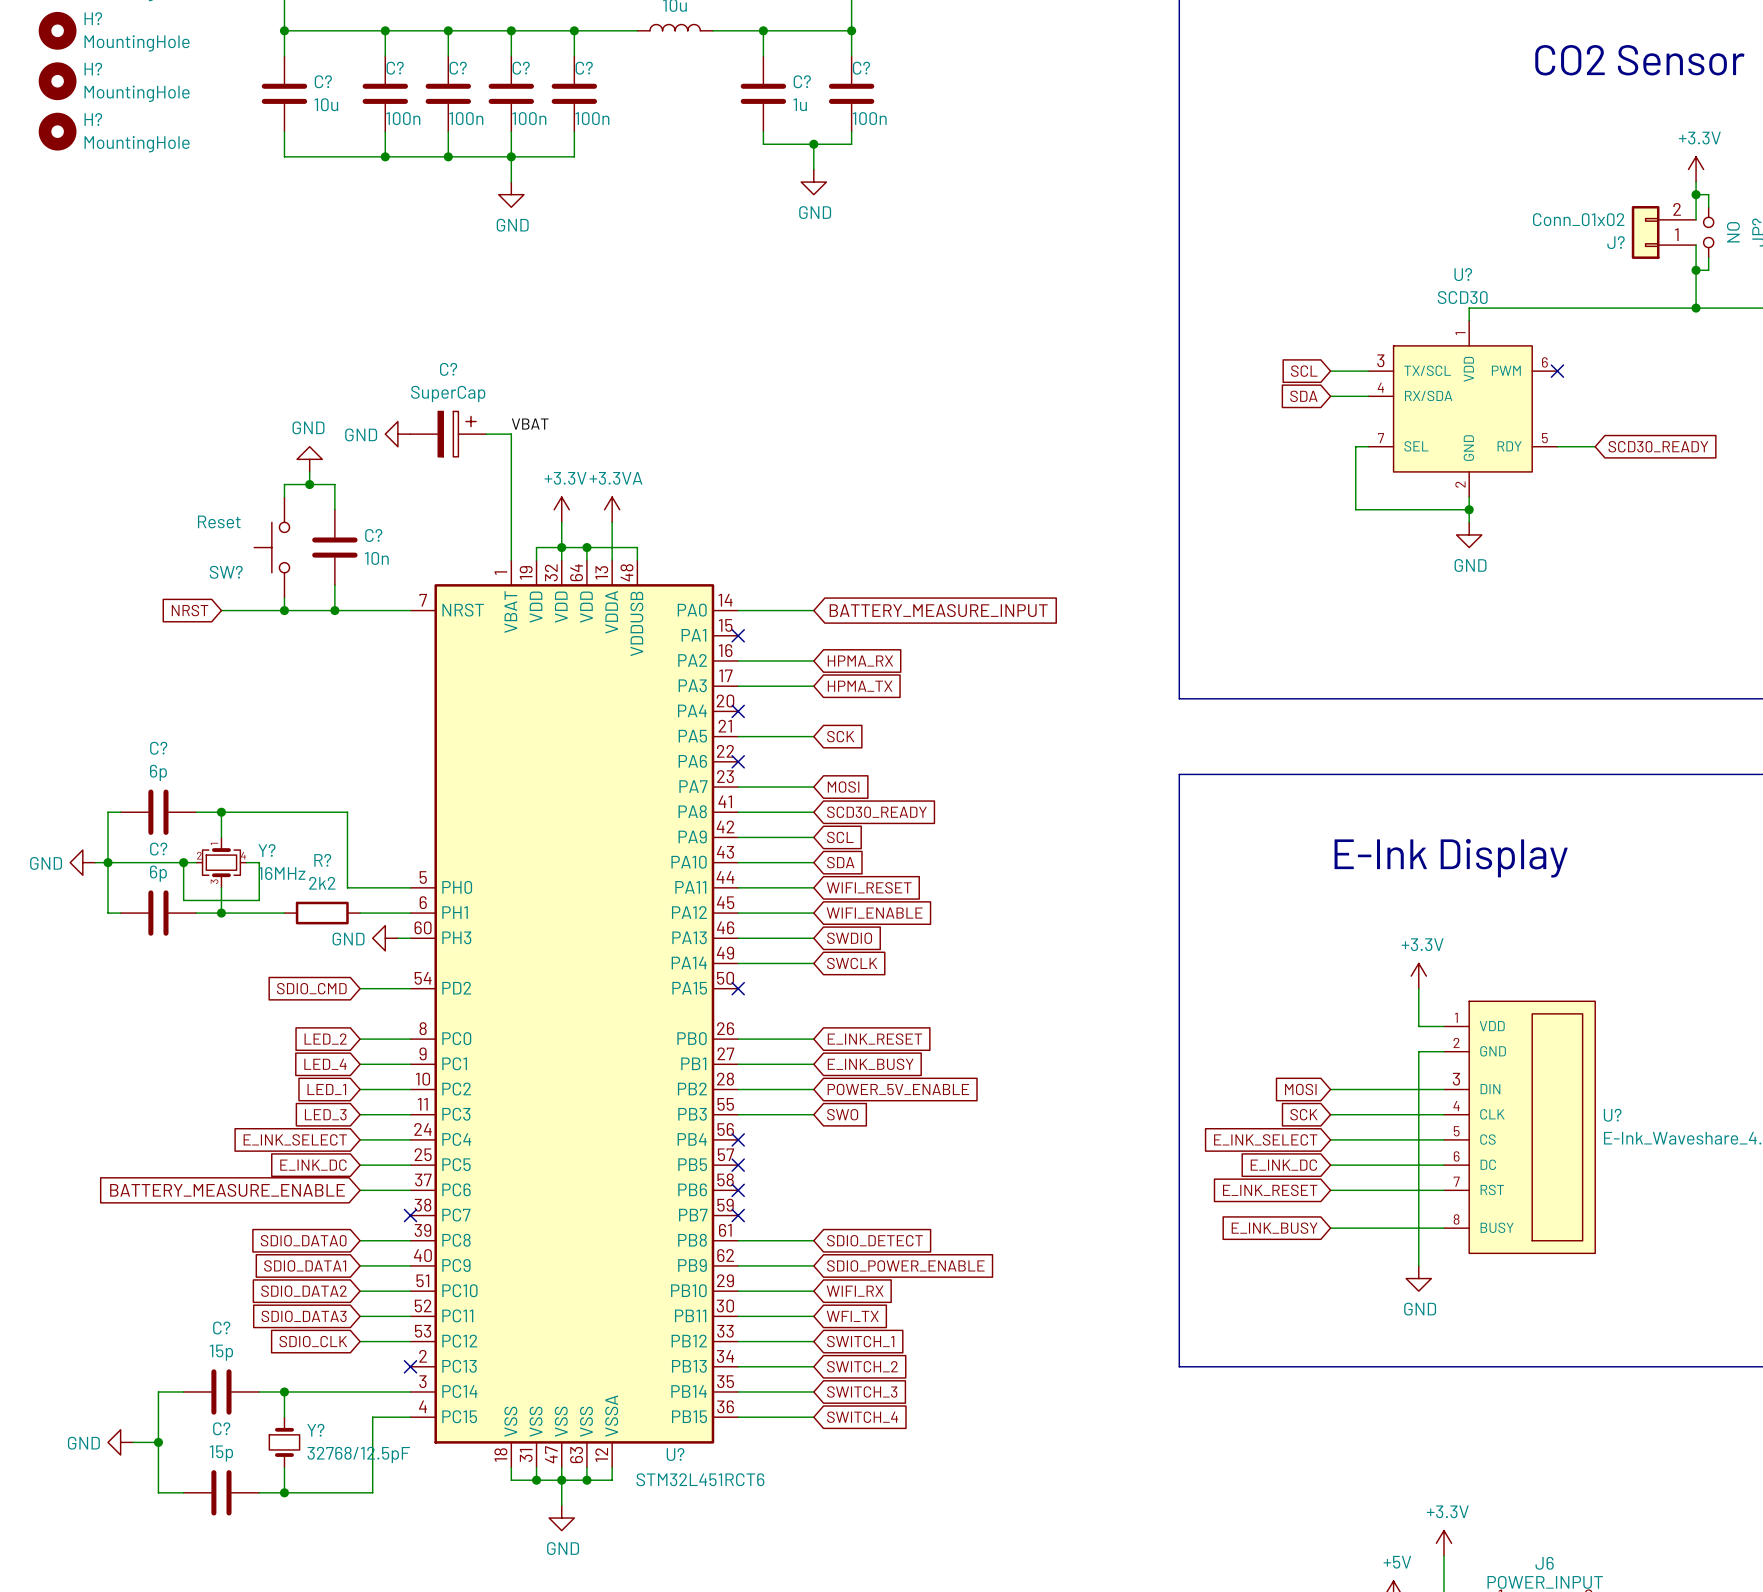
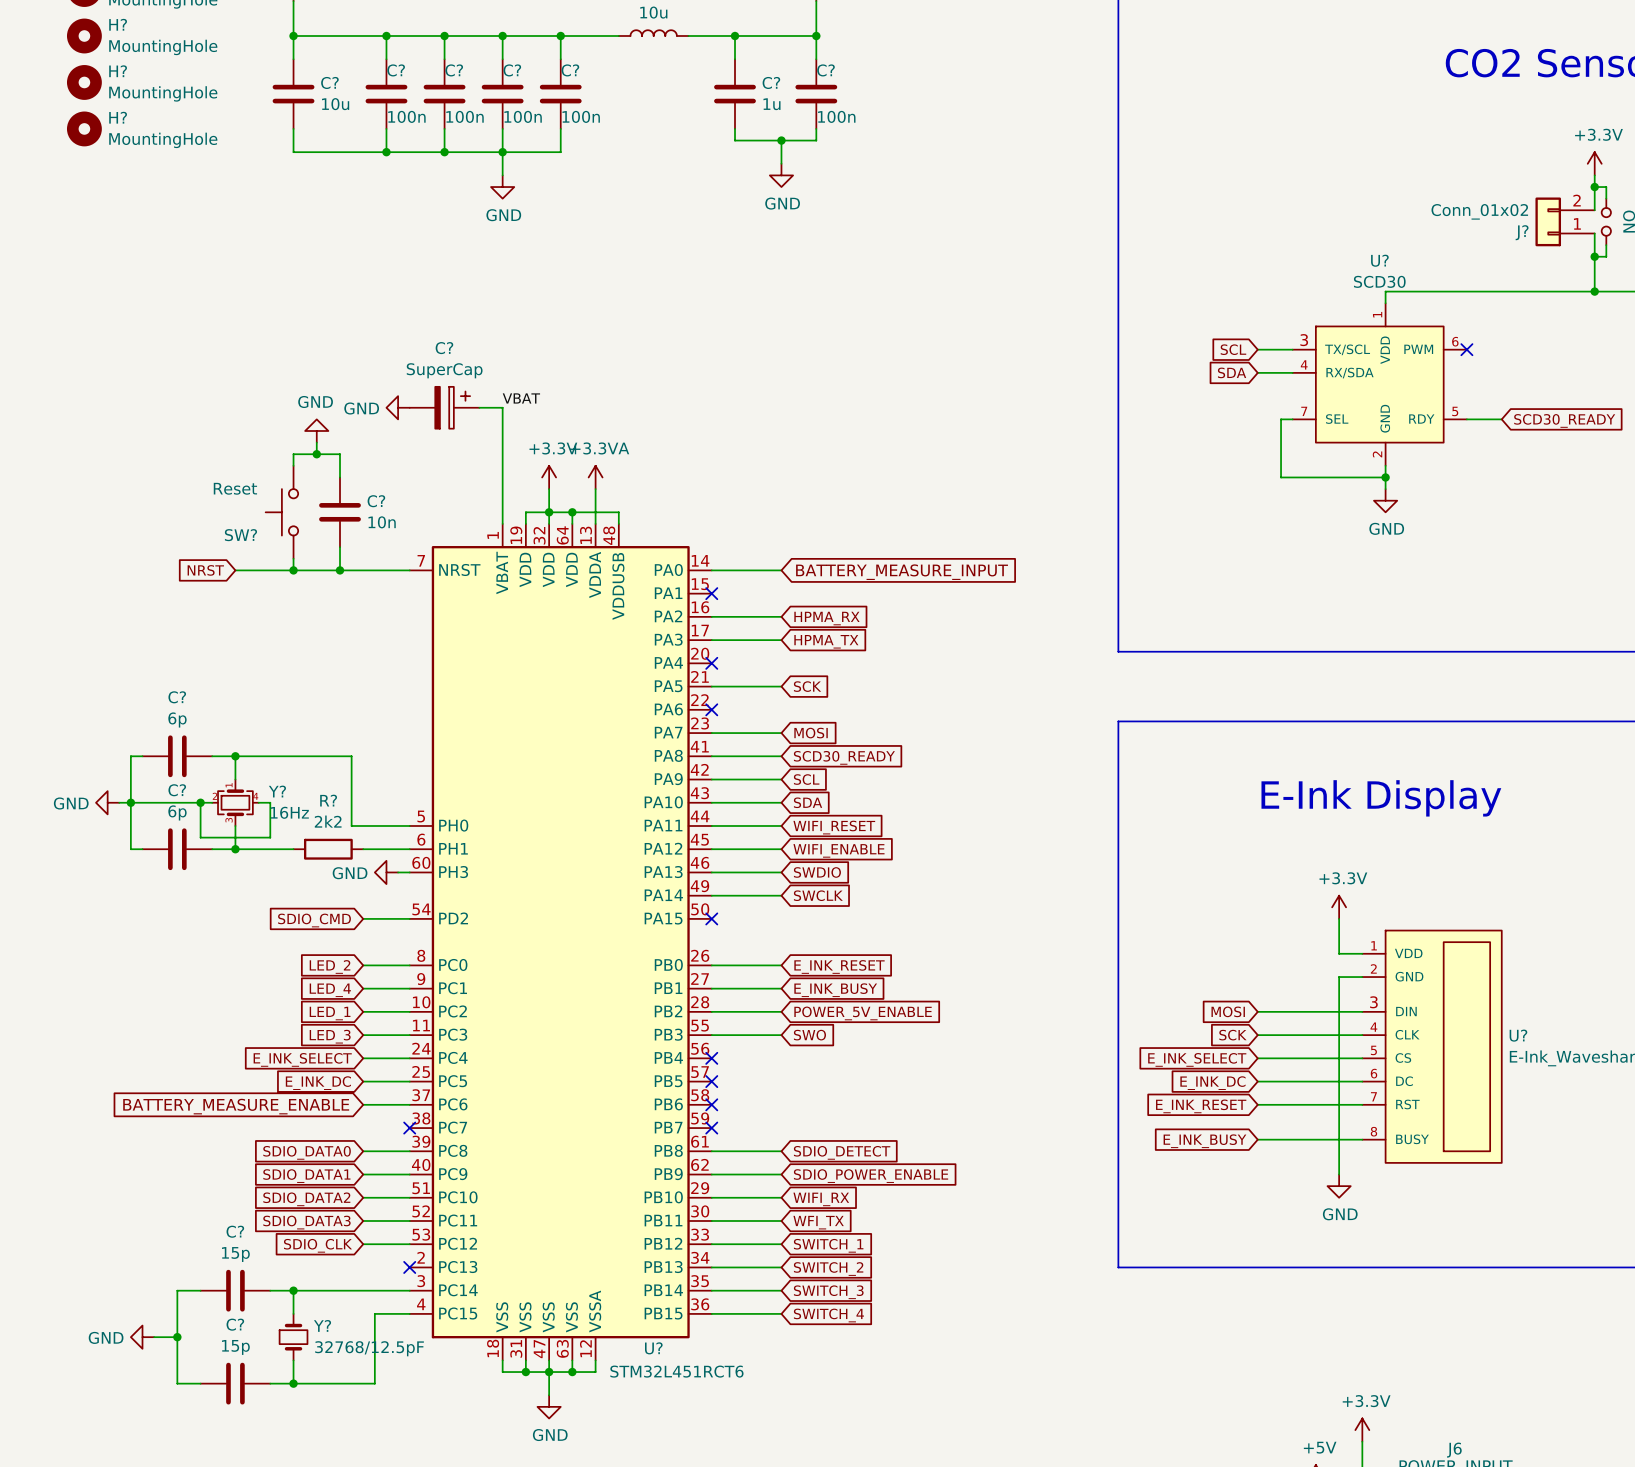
Y? value: 16MHz (282, 873) -> 16Hz (289, 812)

